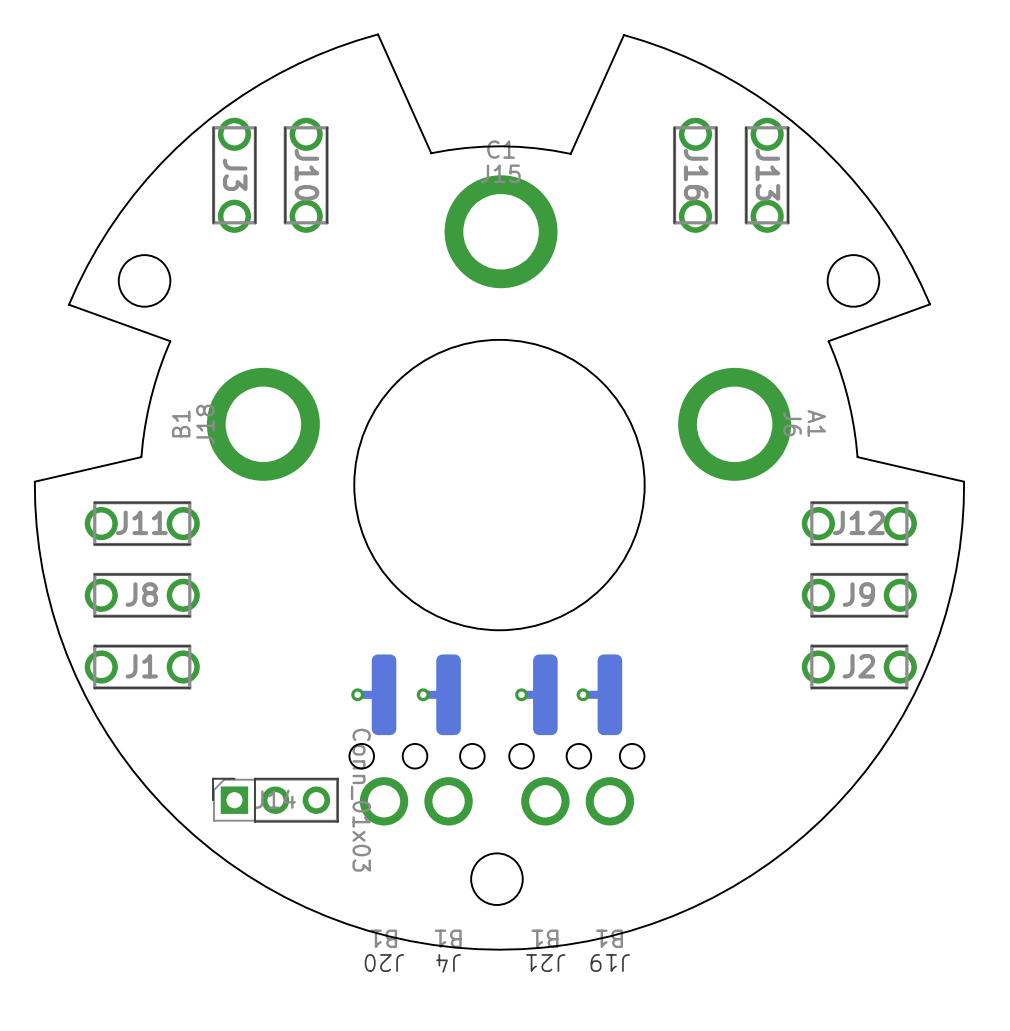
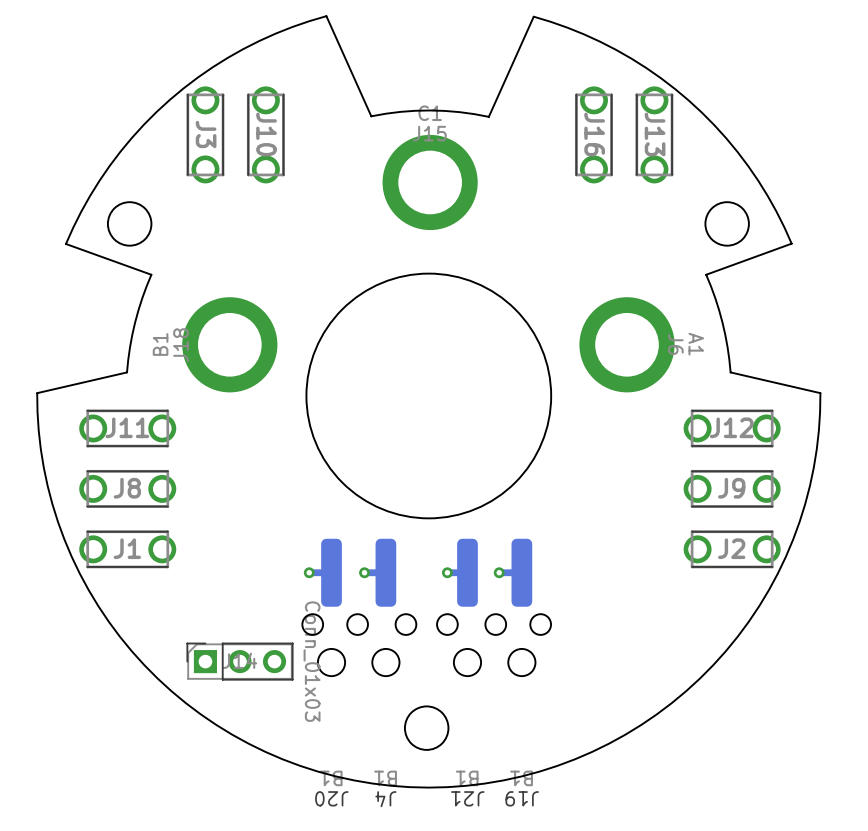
J20 footprint: [359, 654, 409, 826] -> [317, 538, 346, 677]
J4 footprint: [424, 654, 473, 826] -> [372, 538, 400, 677]
J21 footprint: [521, 654, 570, 826] -> [453, 538, 482, 677]
J19 footprint: [585, 654, 635, 826] -> [508, 538, 536, 677]

